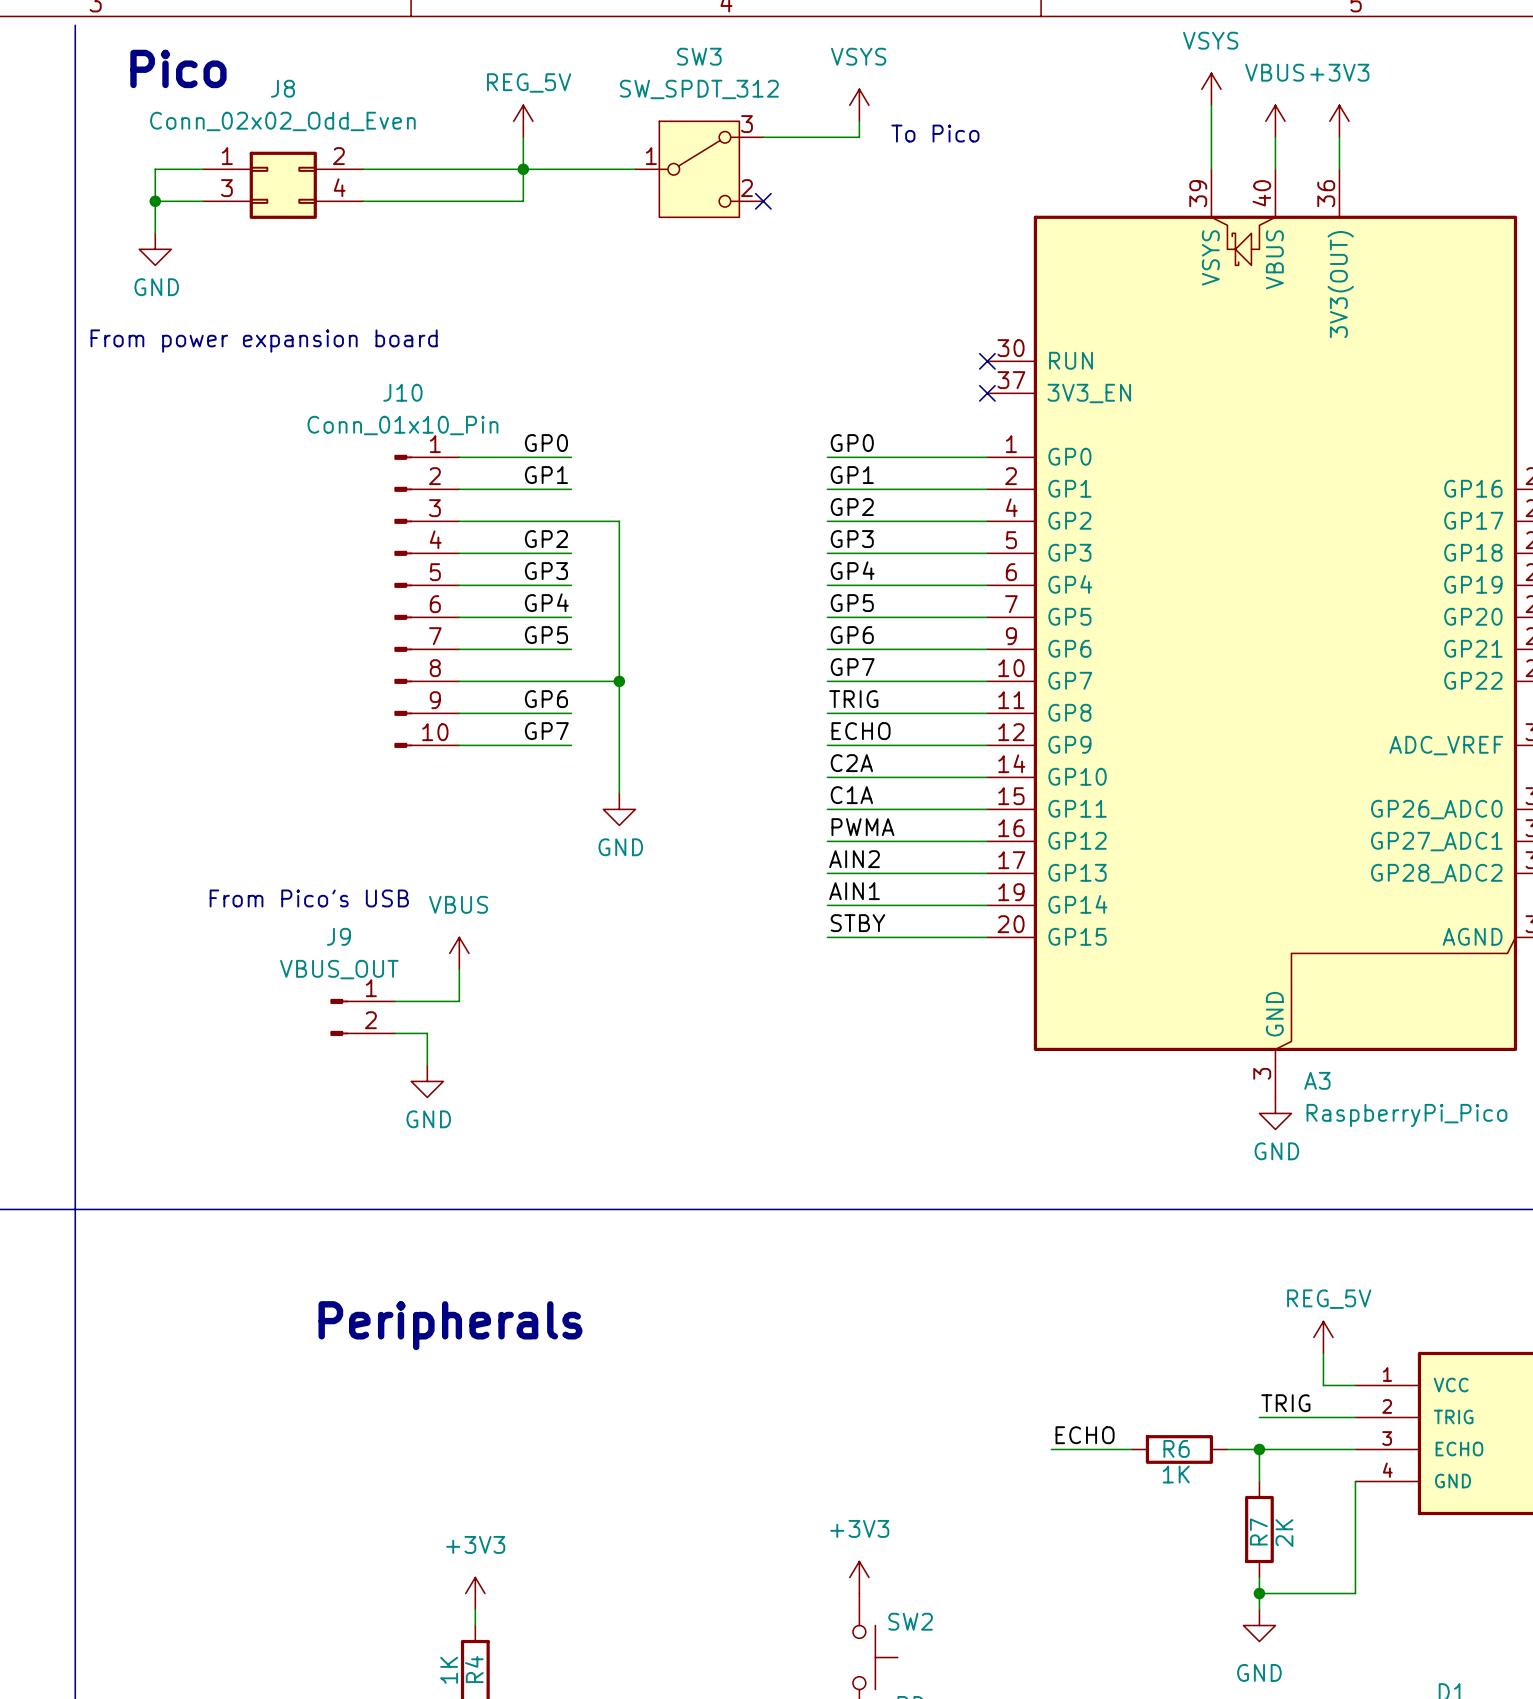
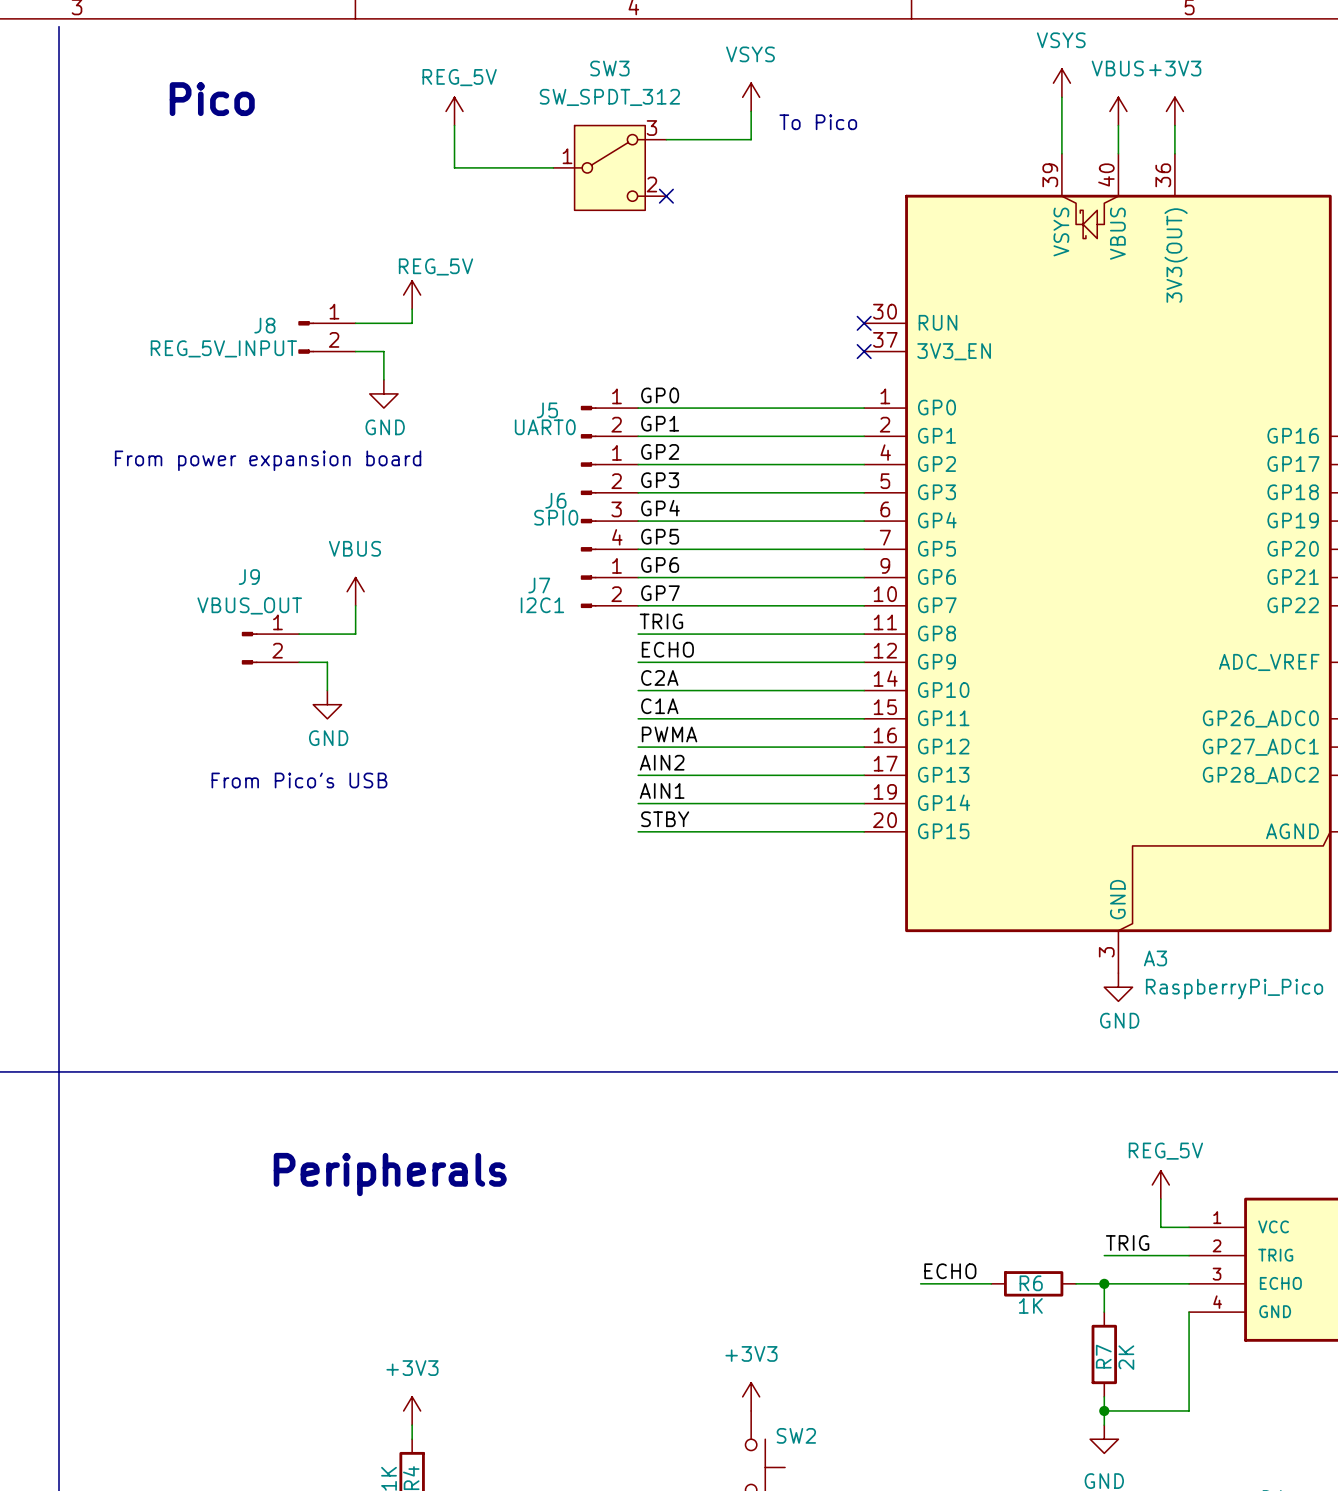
text position: Pico (178, 68) -> Pico (212, 99)
J8 name position: J8 (282, 88) -> J8 (264, 325)
J8 value: Conn_02x02_Odd_Even (282, 121) -> REG_5V_INPUT (223, 348)
wire: (763, 137) (859, 137) -> (666, 139) (751, 139) (751, 125)
J8 symbol: [203, 151, 364, 219] -> [298, 321, 356, 354]
wire: (203, 169) (155, 169) (155, 233) -> none
wire: (363, 169) (635, 169) -> none
junction: (523, 169) -> none
SW3 position: (699, 169) -> (609, 167)
wire: (523, 185) (523, 201) (363, 201) -> (454, 167) (553, 167)
wire: (155, 201) (203, 201) -> none
junction: (155, 201) -> none
no-connect mark position: (763, 201) -> (666, 196)
power symbol: GND (155, 249) -> none
power symbol: none -> REG_5V (412, 295)
text position: From power expansion board (264, 341) -> From power expansion board (268, 460)
wire: none -> (412, 309) (412, 323) (355, 323)
wire: none -> (355, 351) (383, 351) (383, 379)
power symbol: none -> GND (383, 393)
label: GP0 (546, 443) -> none
label: none -> GP0 (660, 395)
label: GP0 (852, 443) -> none
wire: (459, 457) (571, 457) -> none
wire: none -> (638, 408) (722, 408)
J5: none -> UART0 (609, 422)
label: GP1 (546, 475) -> none
label: none -> GP1 (660, 423)
label: GP1 (852, 475) -> none
wire: (459, 489) (571, 489) -> none
wire: none -> (638, 436) (722, 436)
label: none -> GP2 (660, 451)
label: GP2 (852, 507) -> none
wire: (459, 521) (619, 521) (619, 793) -> none
wire: none -> (638, 464) (722, 464)
label: GP2 (546, 539) -> none
label: none -> GP3 (660, 480)
label: GP3 (852, 539) -> none
wire: (459, 553) (571, 553) -> none
wire: none -> (638, 492) (722, 492)
J6: none -> SPI0 (609, 506)
label: none -> GP4 (660, 508)
label: GP4 (852, 570) -> none
label: GP3 (546, 571) -> none
wire: (459, 585) (571, 585) -> none
wire: none -> (638, 521) (722, 521)
J10: Conn_01x10_Pin (426, 601) -> none
label: GP4 (546, 602) -> none
label: none -> GP5 (660, 536)
label: GP5 (852, 603) -> none
wire: (459, 617) (571, 617) -> none
wire: none -> (638, 549) (722, 549)
label: GP5 (546, 635) -> none
label: none -> GP6 (660, 564)
label: GP6 (852, 635) -> none
wire: (459, 649) (571, 649) -> none
wire: none -> (638, 577) (722, 577)
J7: none -> I2C1 (609, 591)
label: none -> GP7 (660, 593)
label: GP7 (852, 667) -> none
wire: (459, 681) (619, 681) -> none
junction: (619, 681) -> none
wire: none -> (638, 605) (722, 605)
label: GP6 (546, 699) -> none
label position: TRIG (853, 699) -> TRIG (661, 621)
wire: (459, 713) (571, 713) -> none
wire: none -> (638, 634) (722, 634)
label: GP7 (546, 731) -> none
label position: ECHO (861, 731) -> ECHO (667, 649)
wire: (459, 745) (571, 745) -> none
wire: none -> (638, 662) (722, 662)
label position: C2A (851, 763) -> C2A (659, 677)
wire: none -> (638, 690) (722, 690)
power symbol: none -> GND (327, 704)
label position: C1A (851, 795) -> C1A (659, 706)
power symbol: GND (619, 809) -> none
wire: none -> (638, 718) (722, 718)
label position: PWMA (862, 827) -> PWMA (669, 734)
wire: none -> (638, 747) (722, 747)
label position: AIN2 (854, 859) -> AIN2 (662, 762)
wire: none -> (638, 775) (722, 775)
label position: AIN1 (854, 891) -> AIN1 (662, 790)
text position: From Pico's USB (309, 898) -> From Pico's USB (299, 780)
wire: none -> (638, 803) (722, 803)
label position: STBY (857, 923) -> STBY (665, 819)
wire: none -> (638, 831) (722, 831)
power symbol position: VBUS (459, 953) -> VBUS (355, 591)
wire: (459, 969) (459, 1001) (395, 1001) -> (355, 605) (355, 634) (299, 634)
J9 position: (362, 1017) -> (270, 648)
wire: (395, 1033) (427, 1033) (427, 1065) -> (299, 662) (327, 662) (327, 690)
power symbol: GND (427, 1081) -> none

